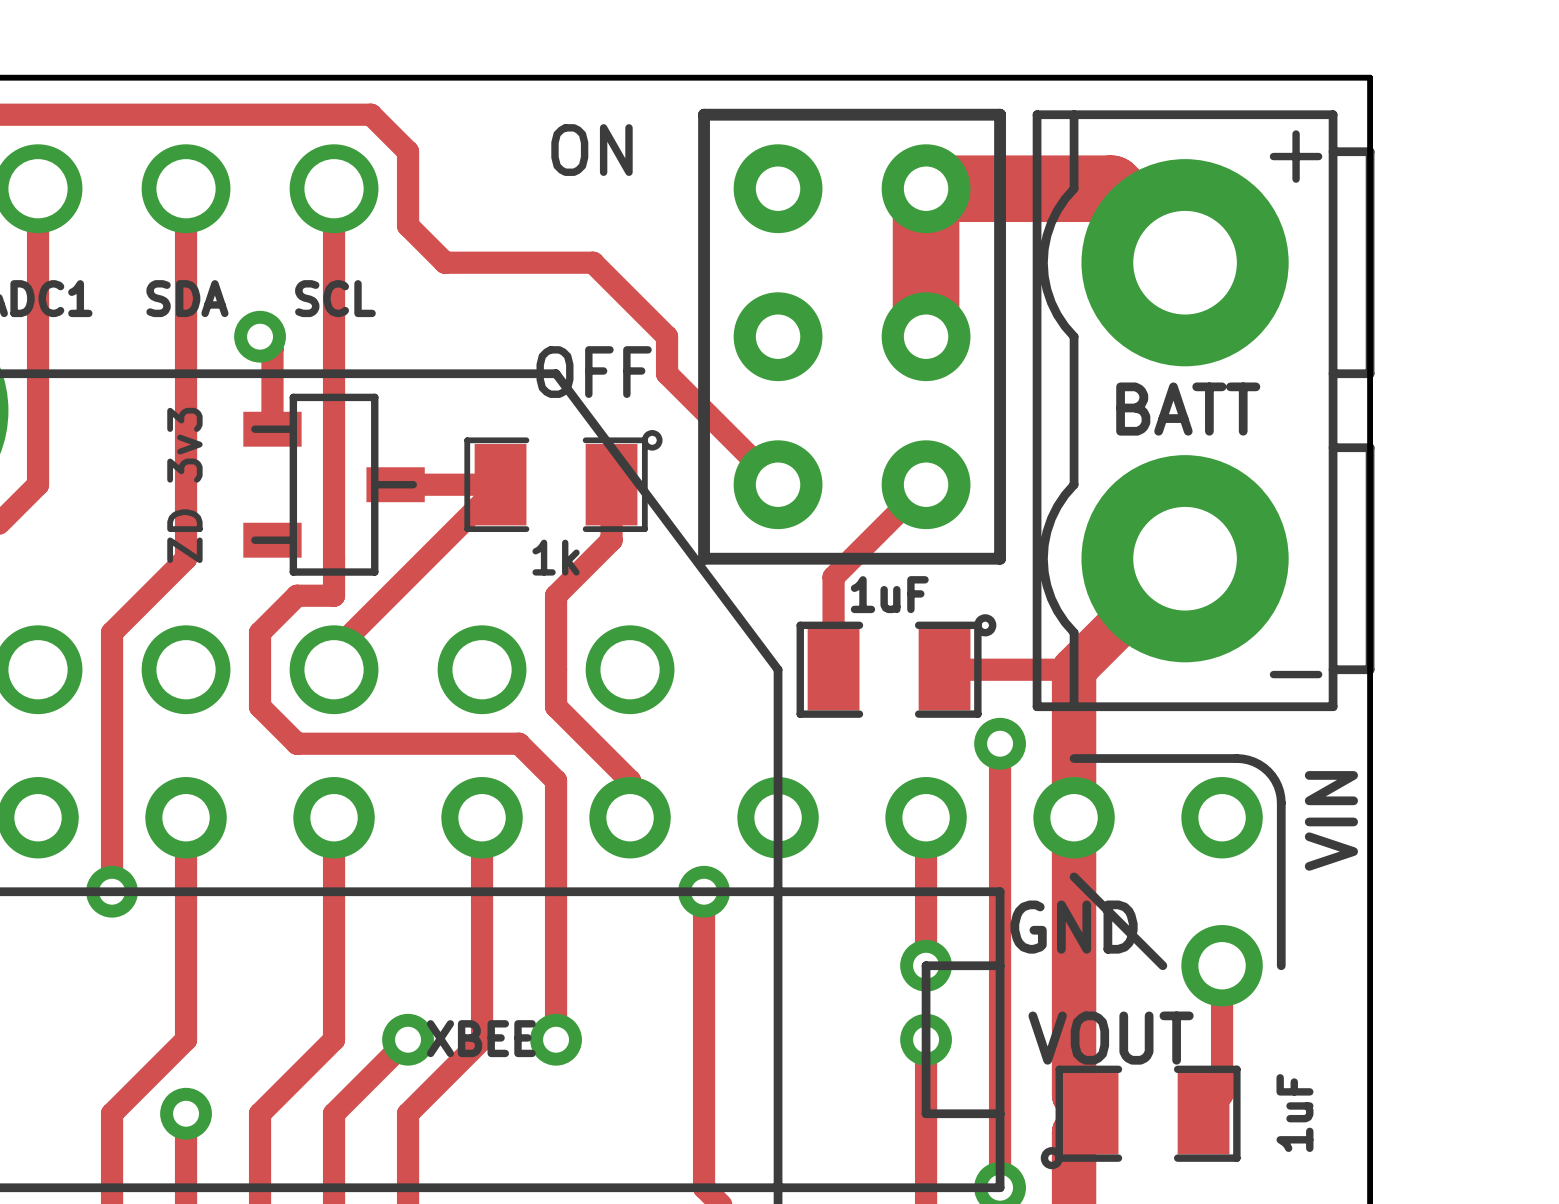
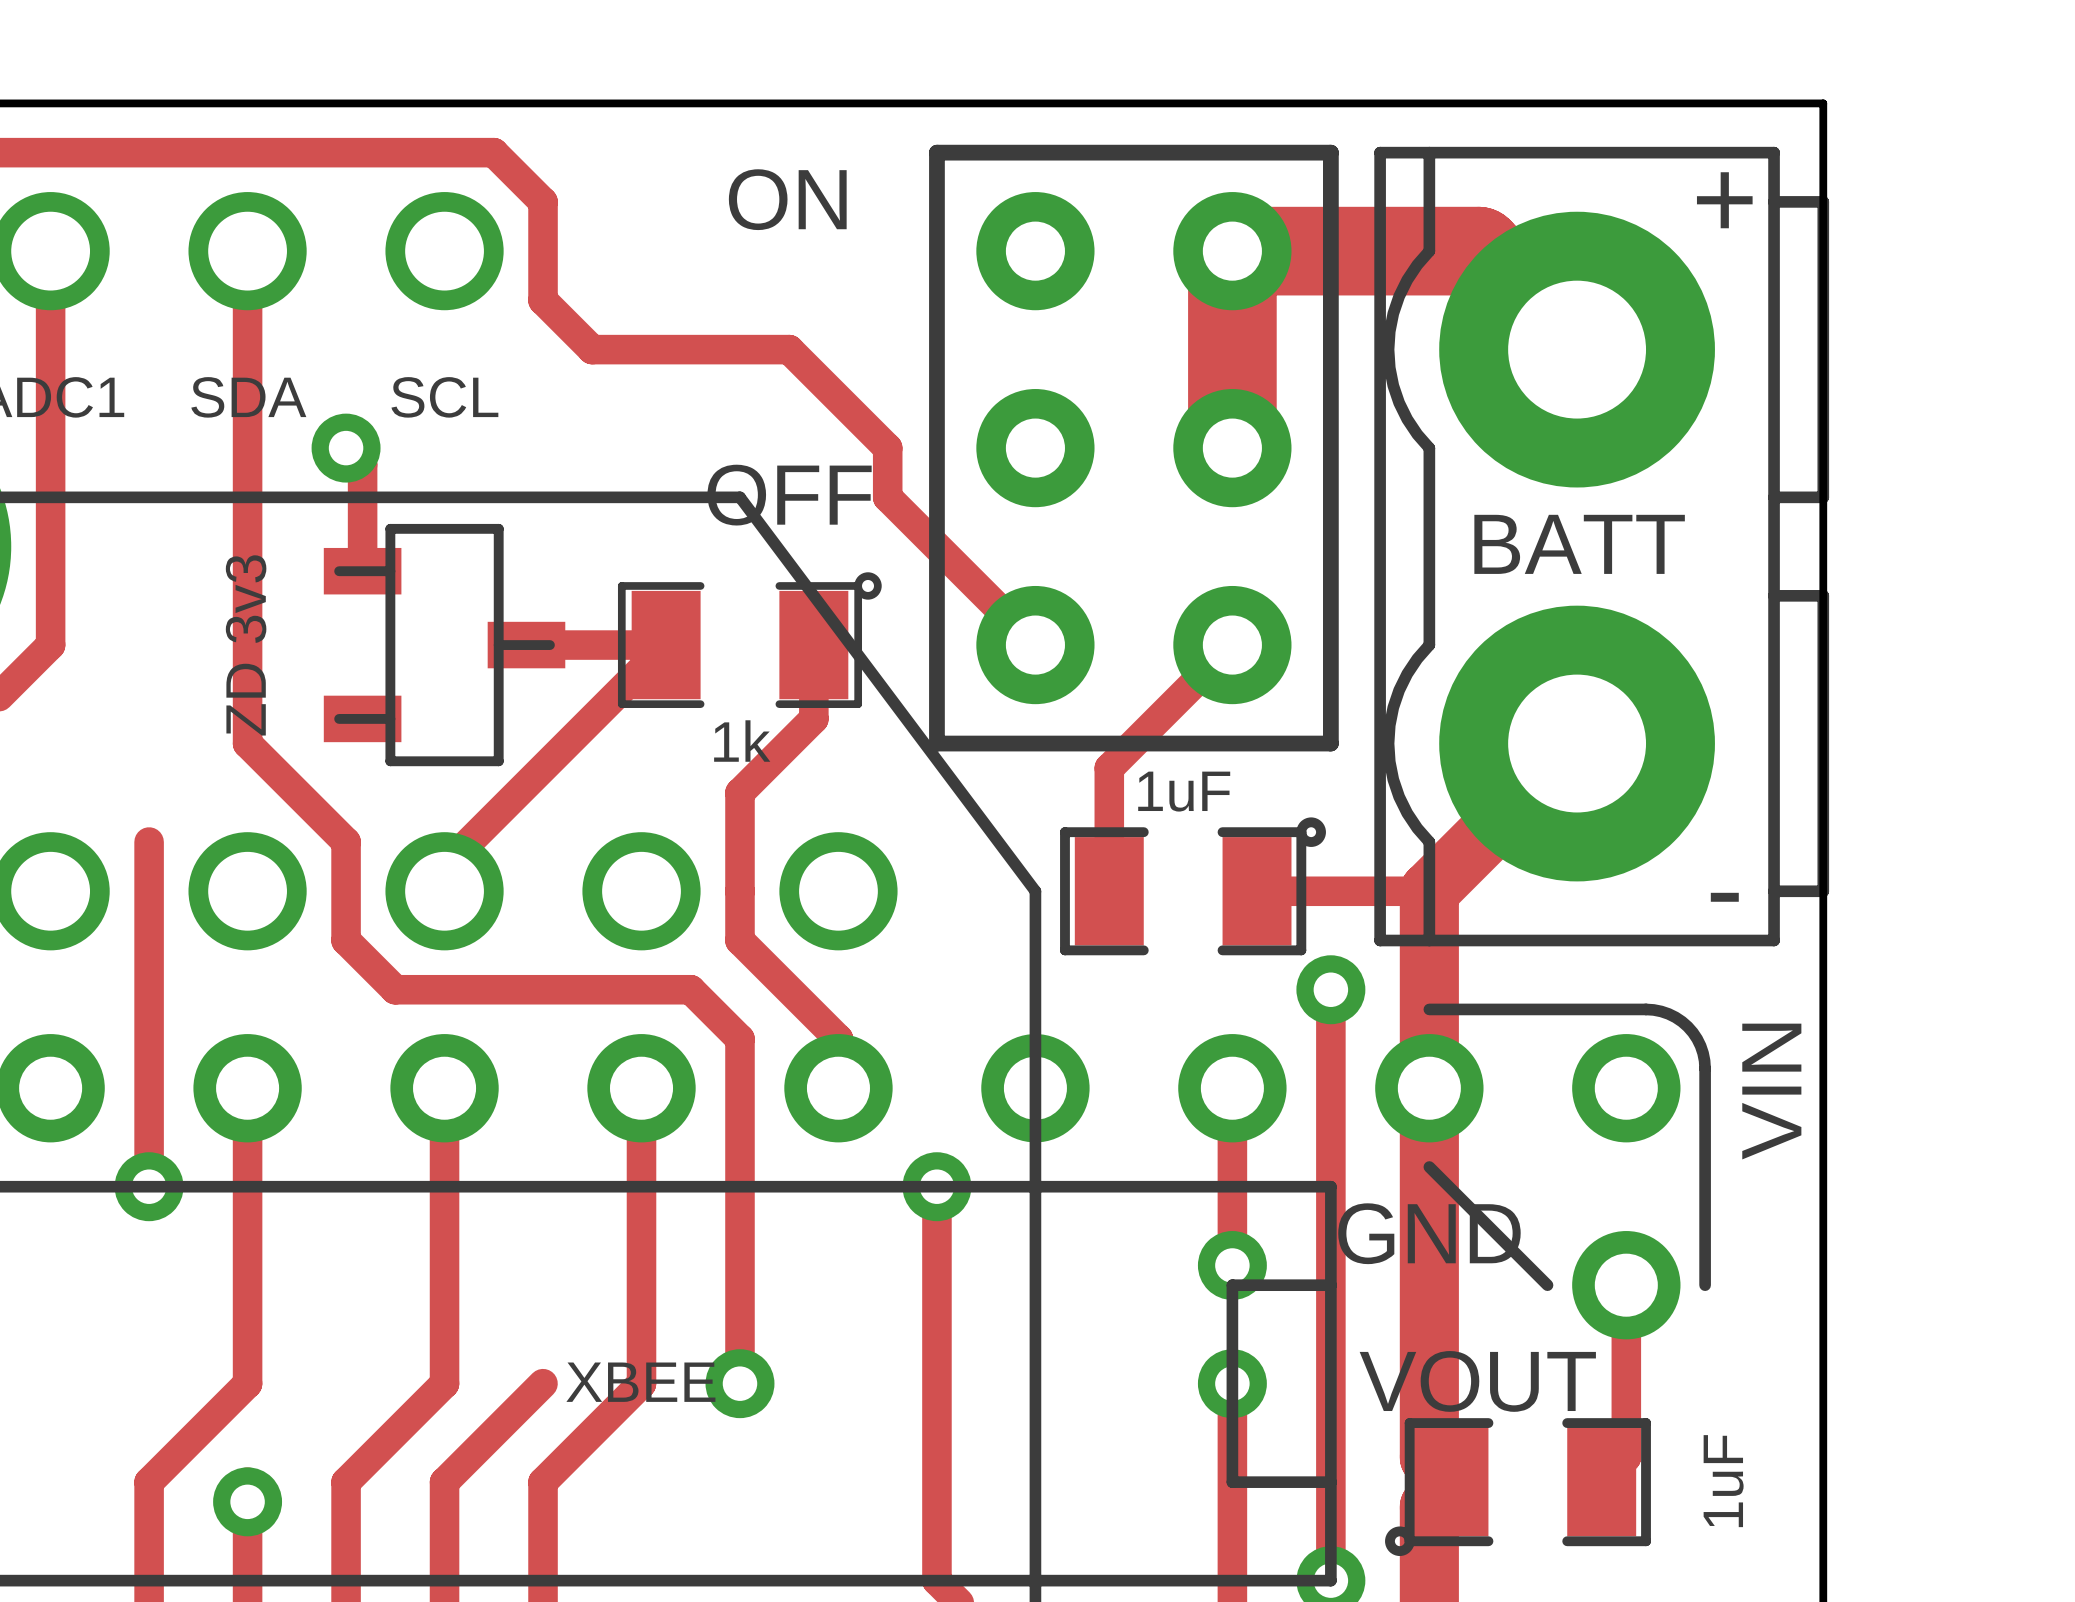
track: (334, 188) (334, 595) (297, 595) (260, 632) -> none
track: (186, 558) (112, 632) -> (247, 743) (346, 842)
via position: (926, 965) -> (1232, 1265)
via: (408, 1039) -> none
via position: (186, 1113) -> (247, 1501)

